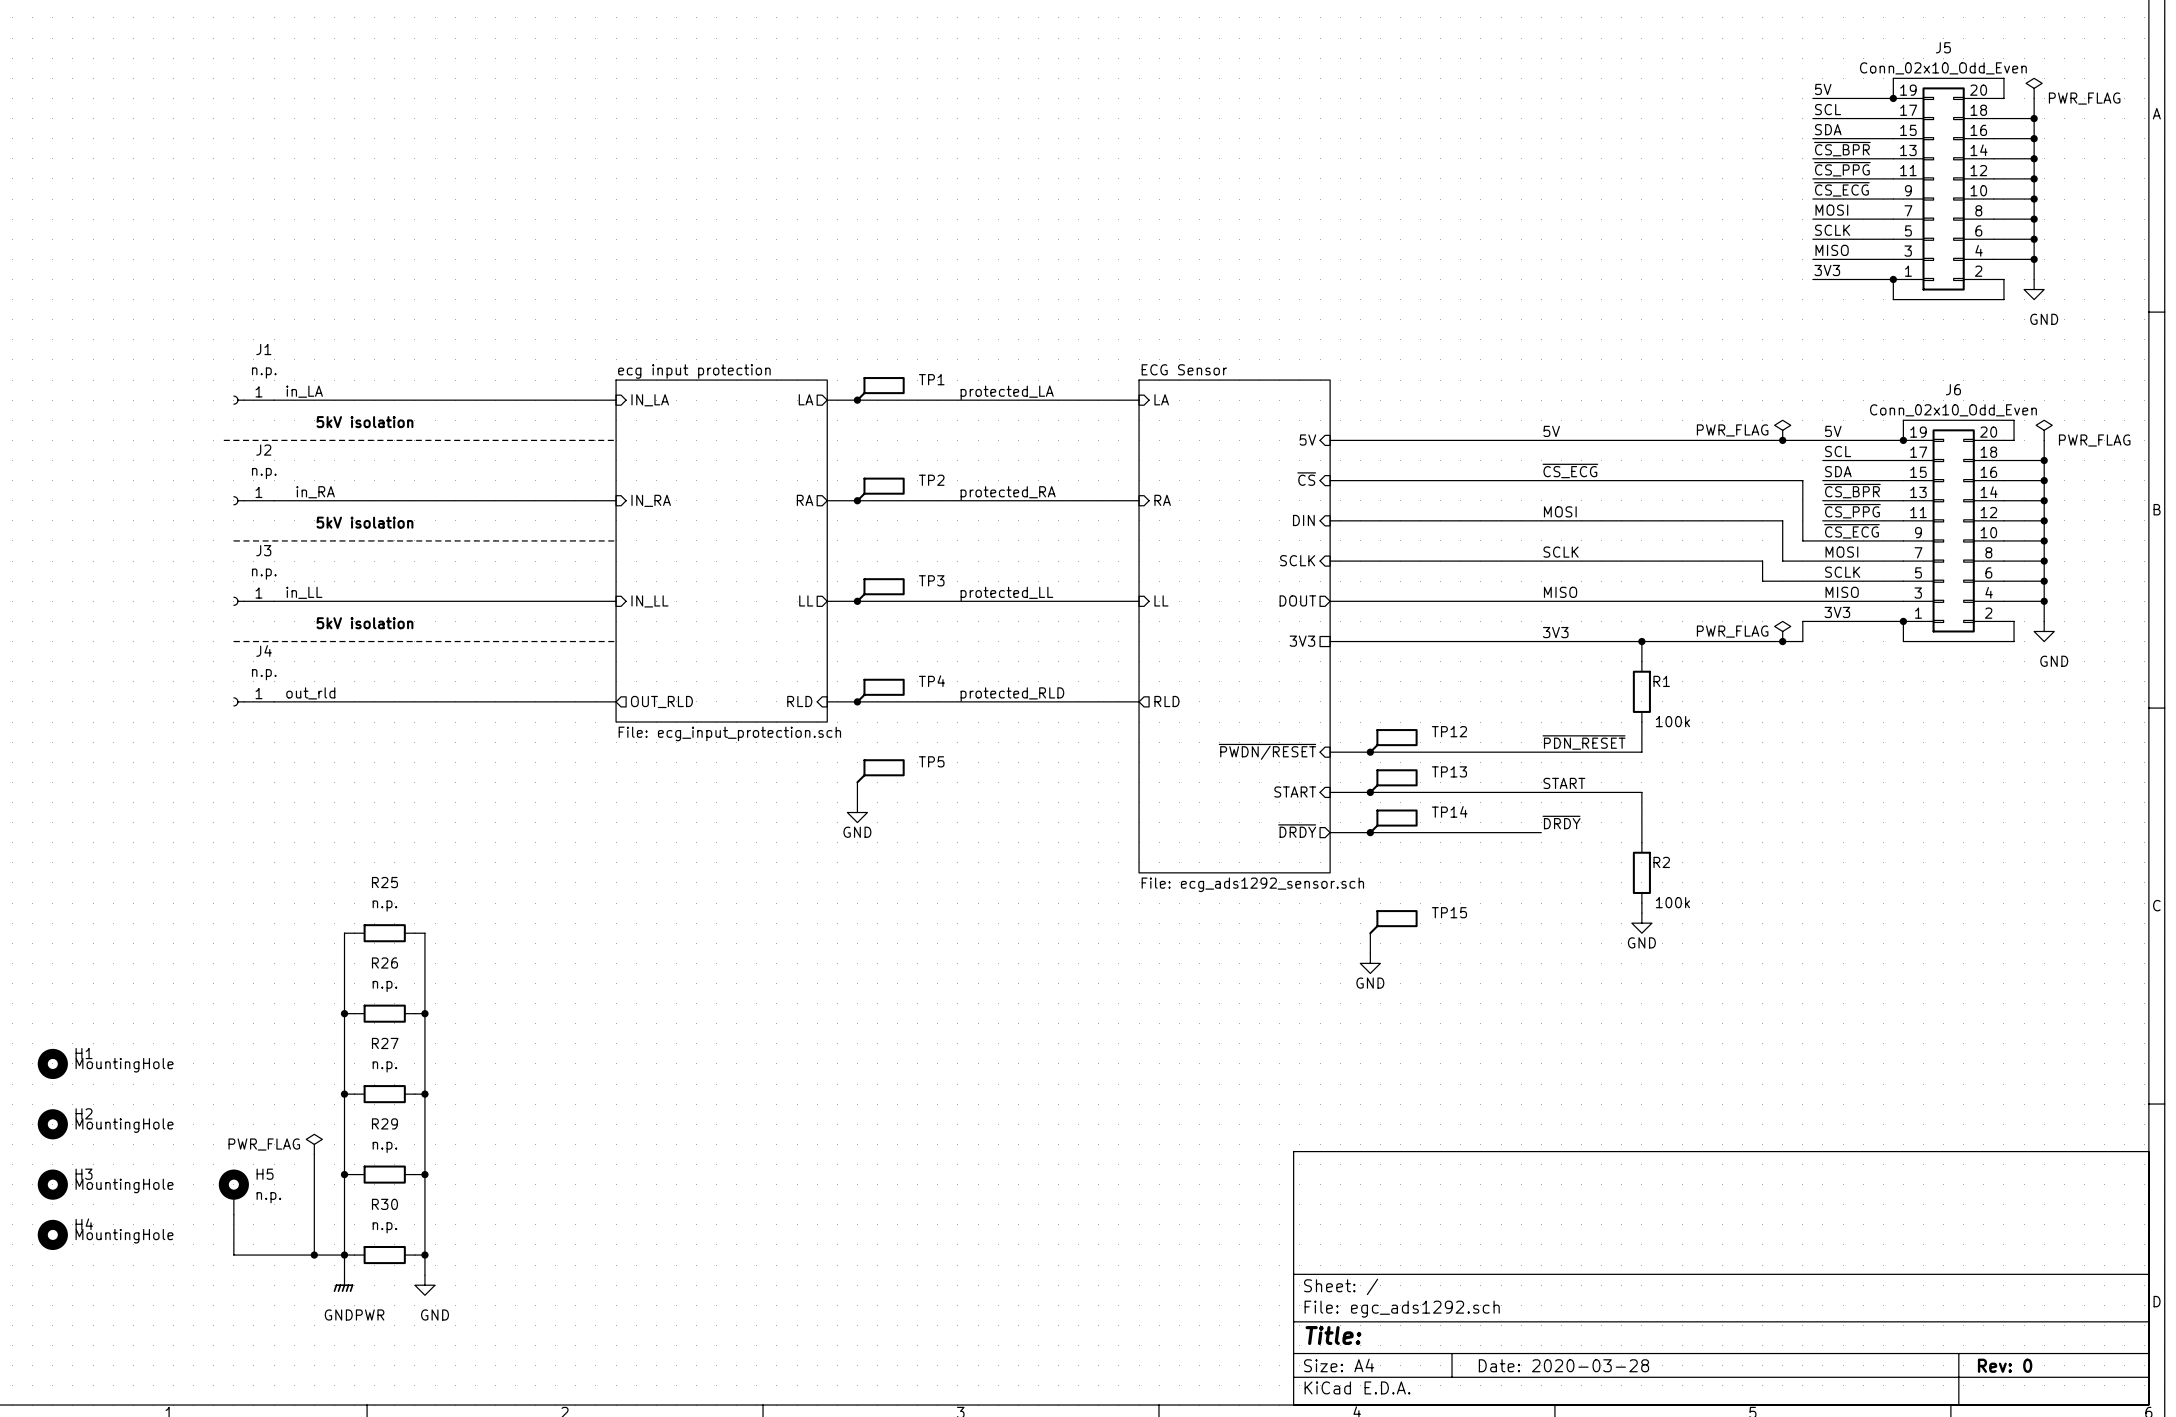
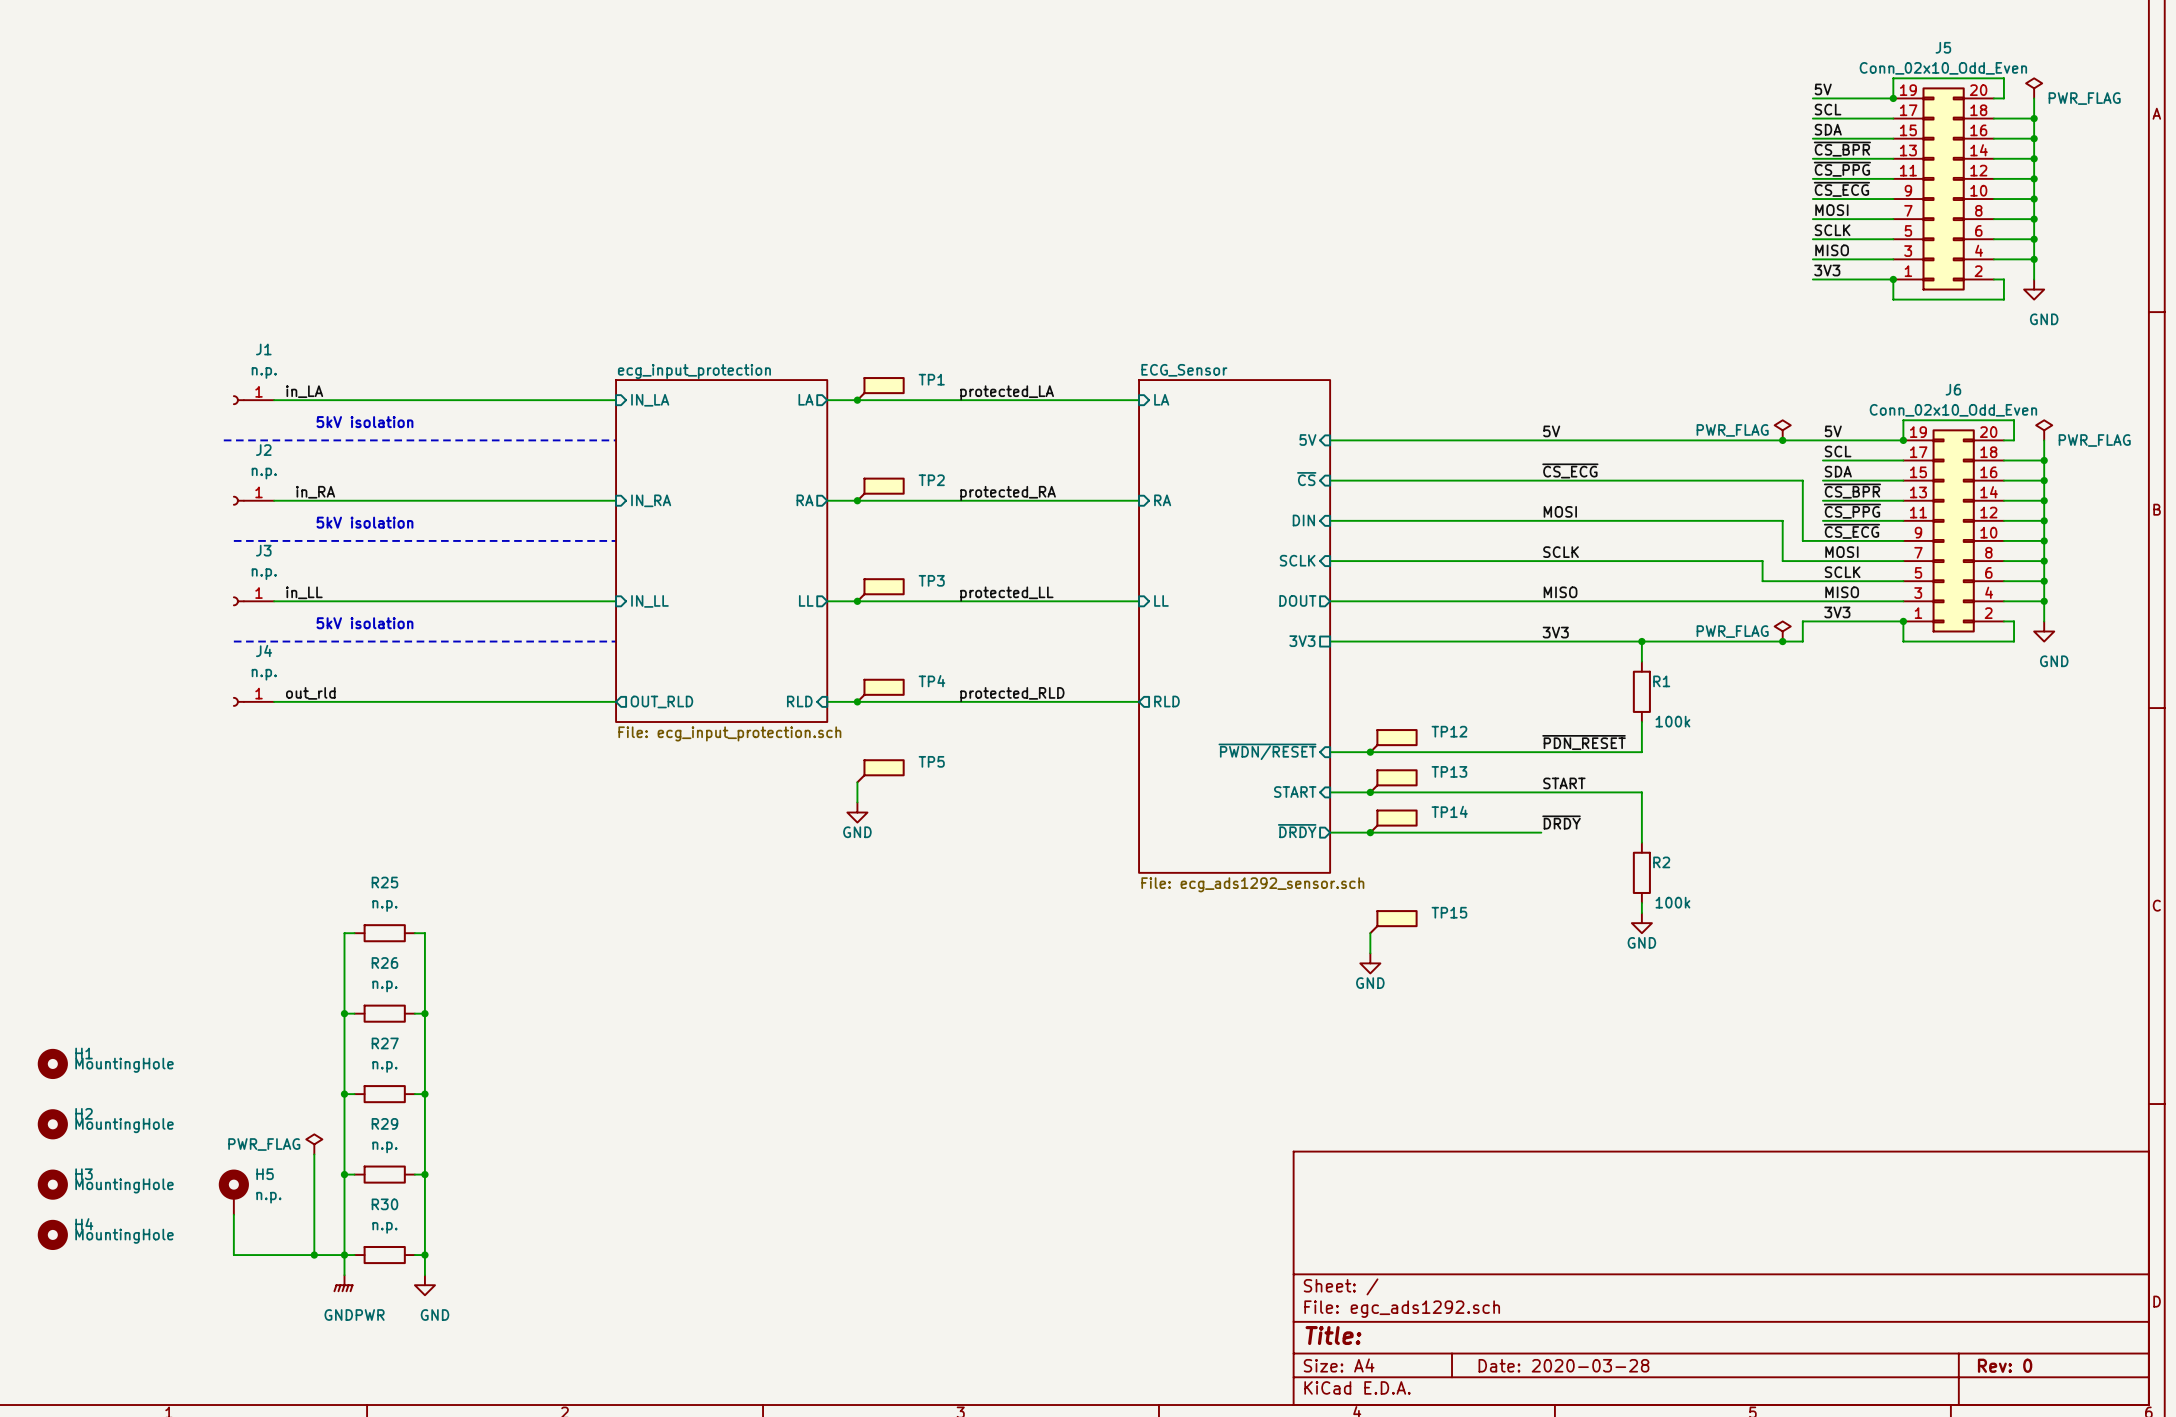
sheet ECG Sensor name: ECG Sensor (1184, 369) -> ECG_Sensor (1184, 370)
sheet ecg input protection name: ecg input protection (694, 371) -> ecg_input_protection (694, 371)

